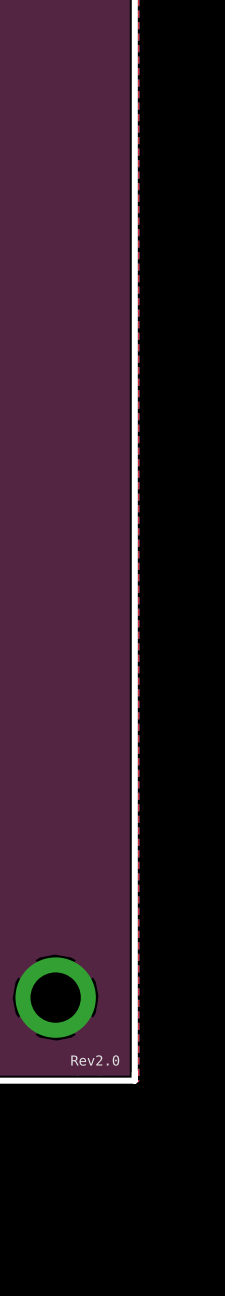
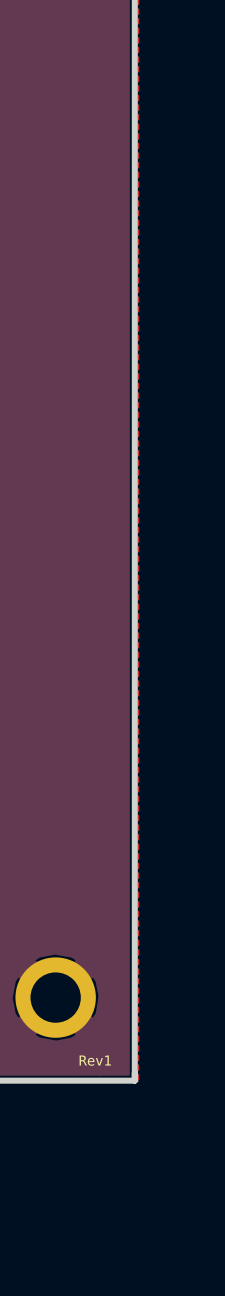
text: Rev2.0 (95, 1060) -> Rev1 (95, 1060)

